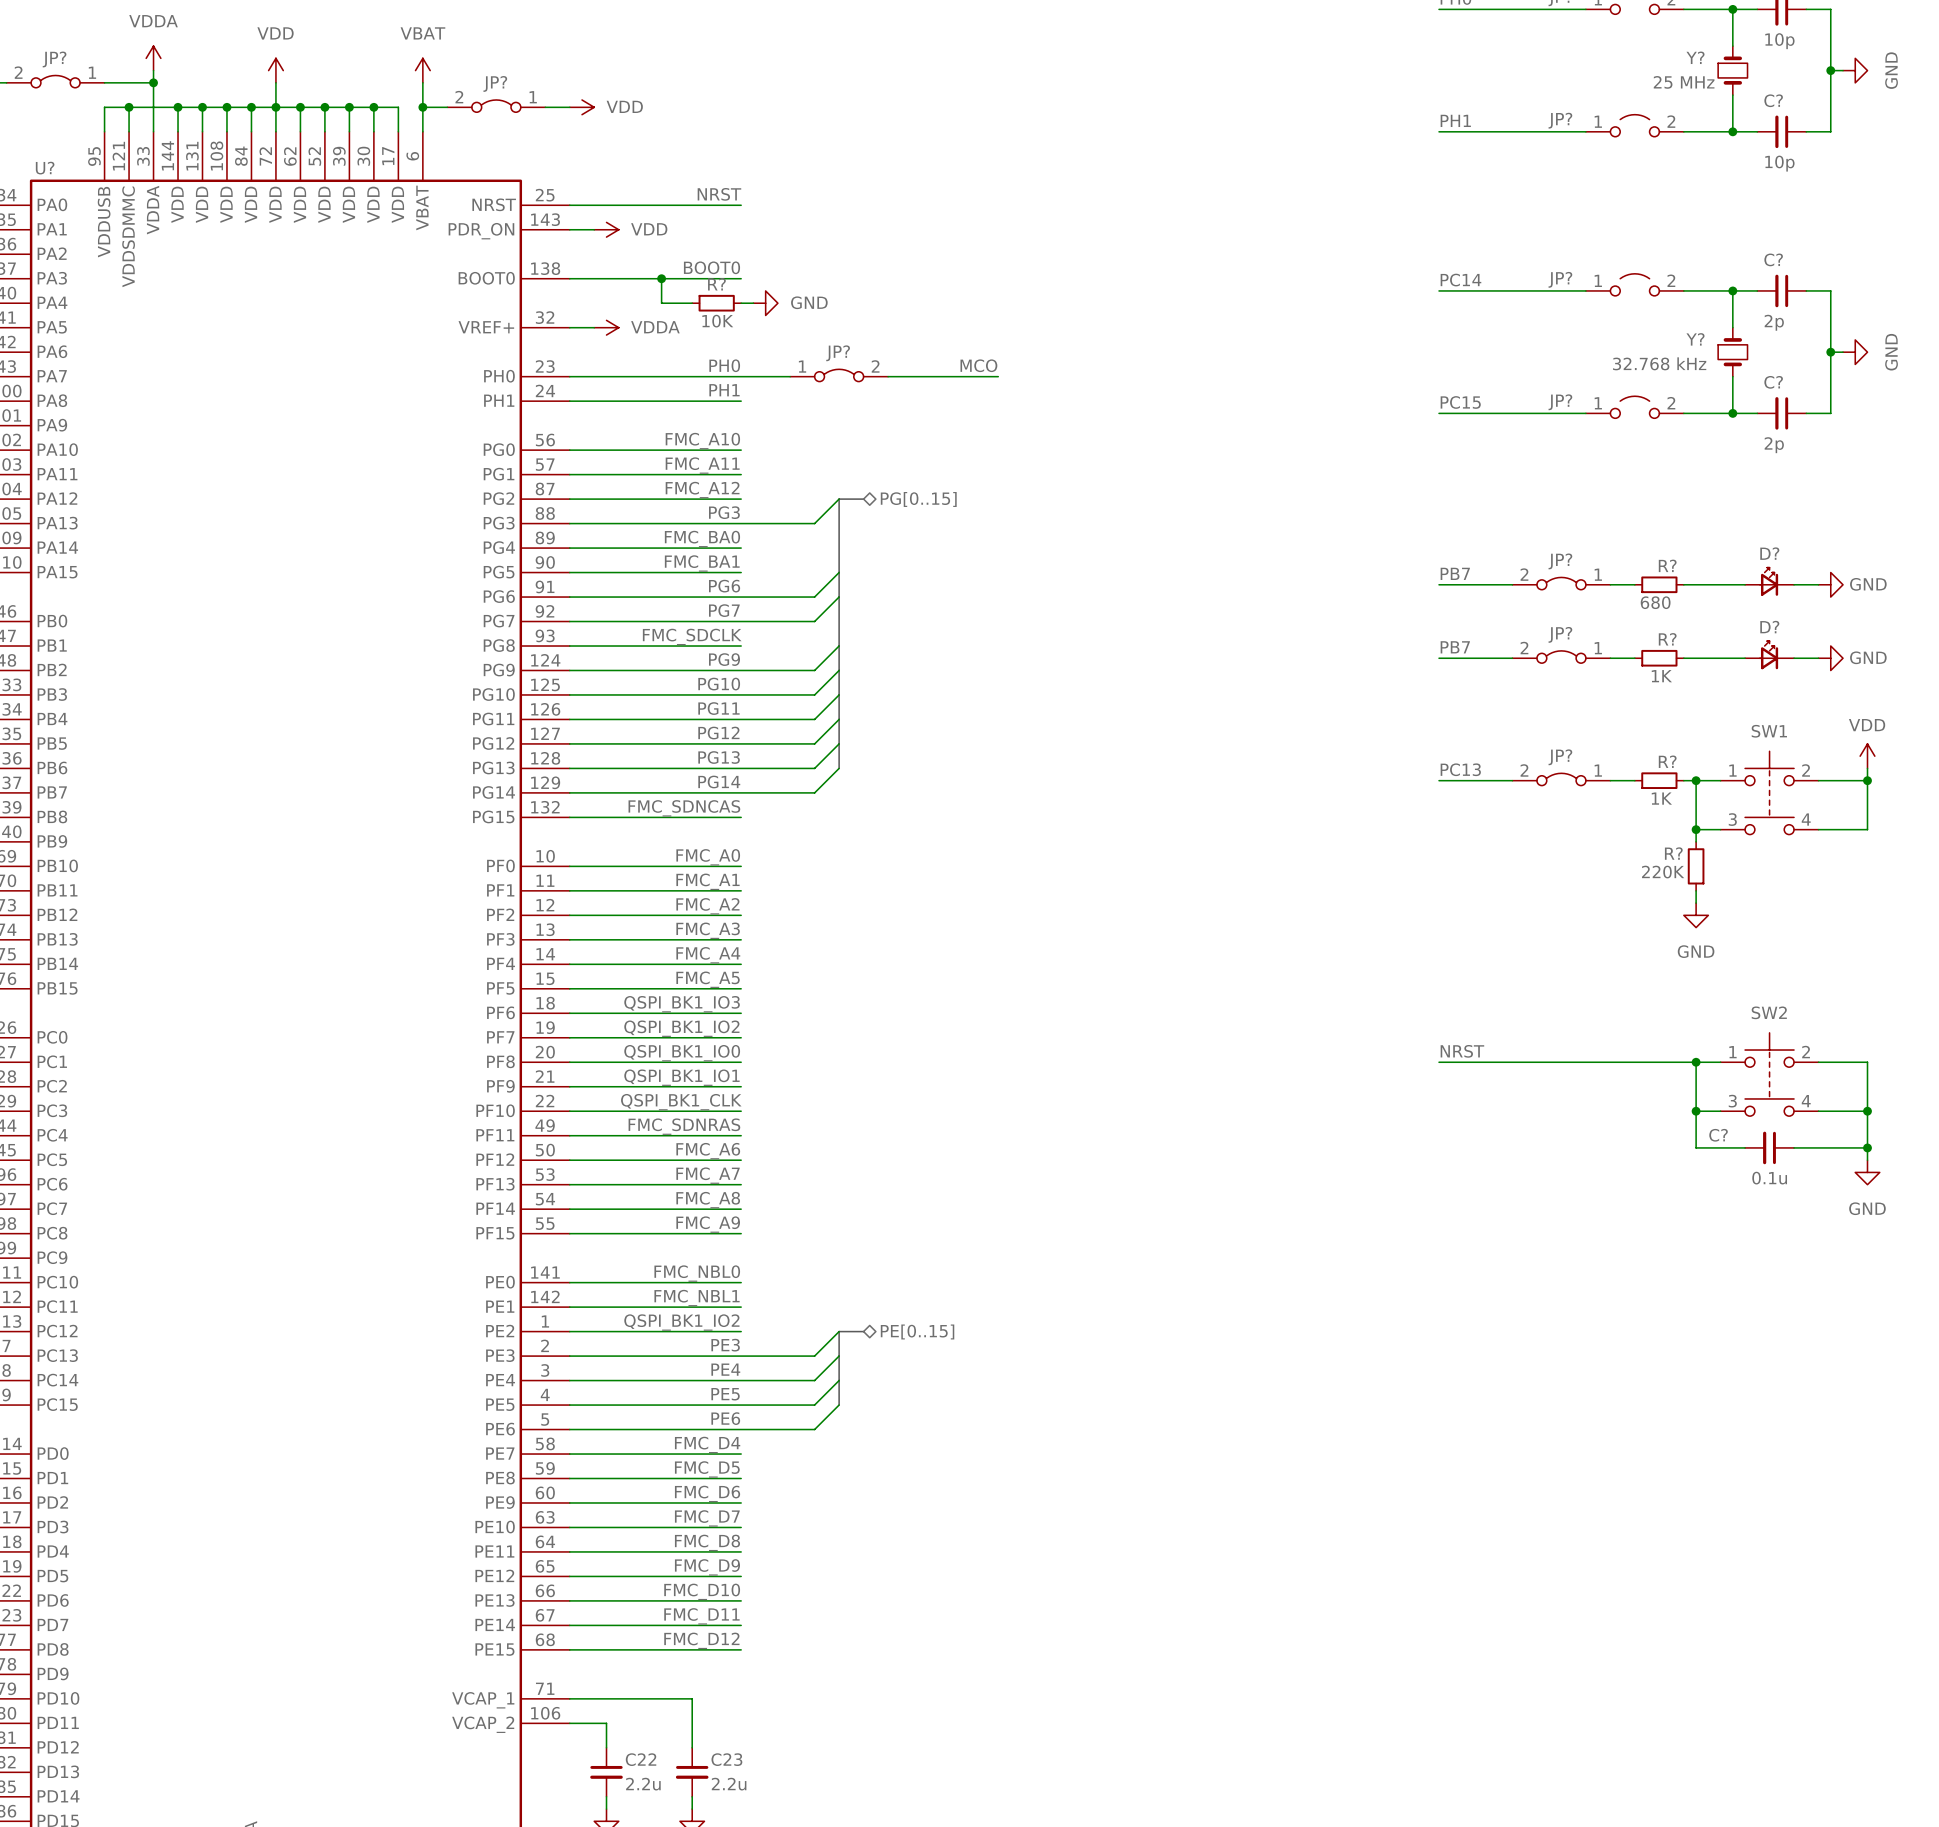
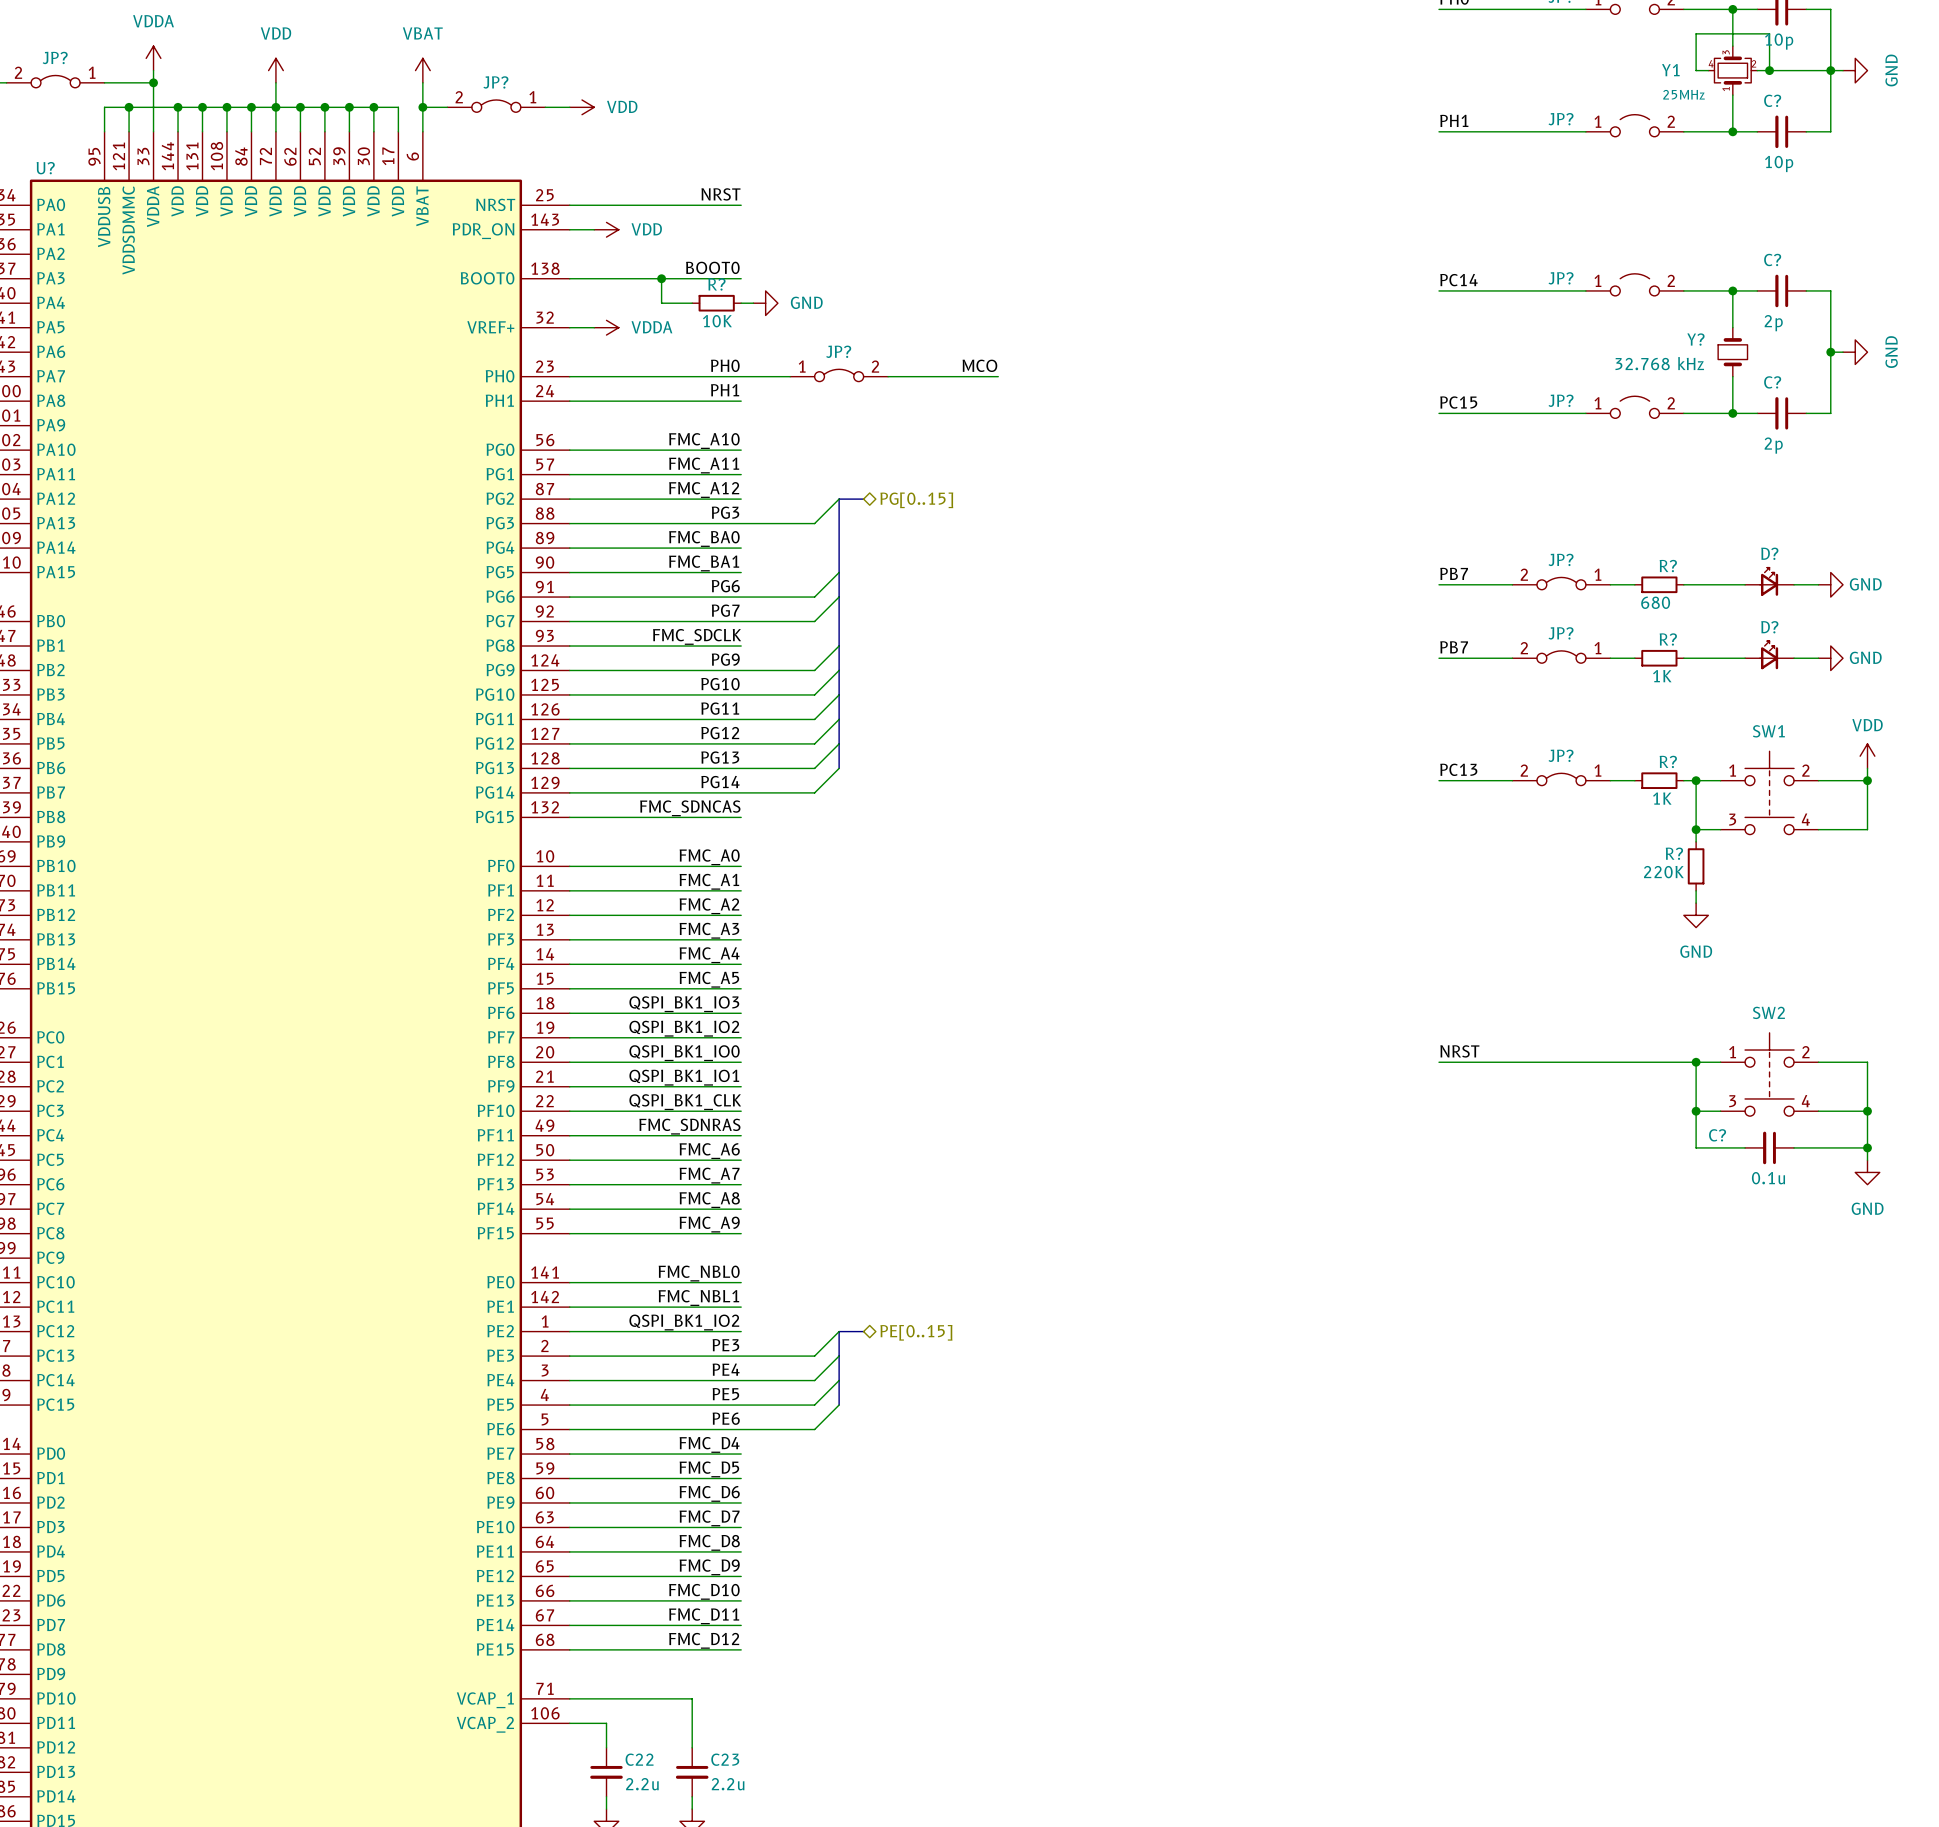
wire: none -> (1708, 70) (1696, 70) (1696, 33) (1769, 33) (1769, 70)
Y?: 25 MHz (1732, 70) -> none
Y1: none -> 25MHz (1732, 70)
wire: none -> (1757, 70) (1830, 70)
junction: none -> (1769, 70)

